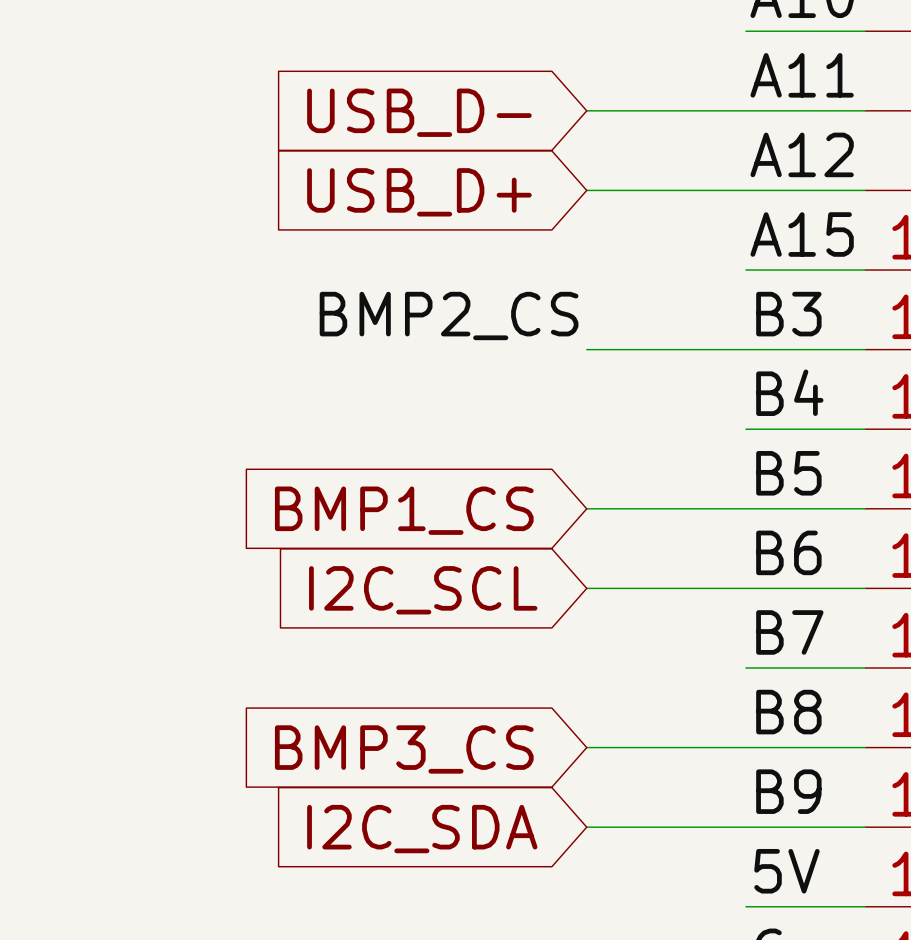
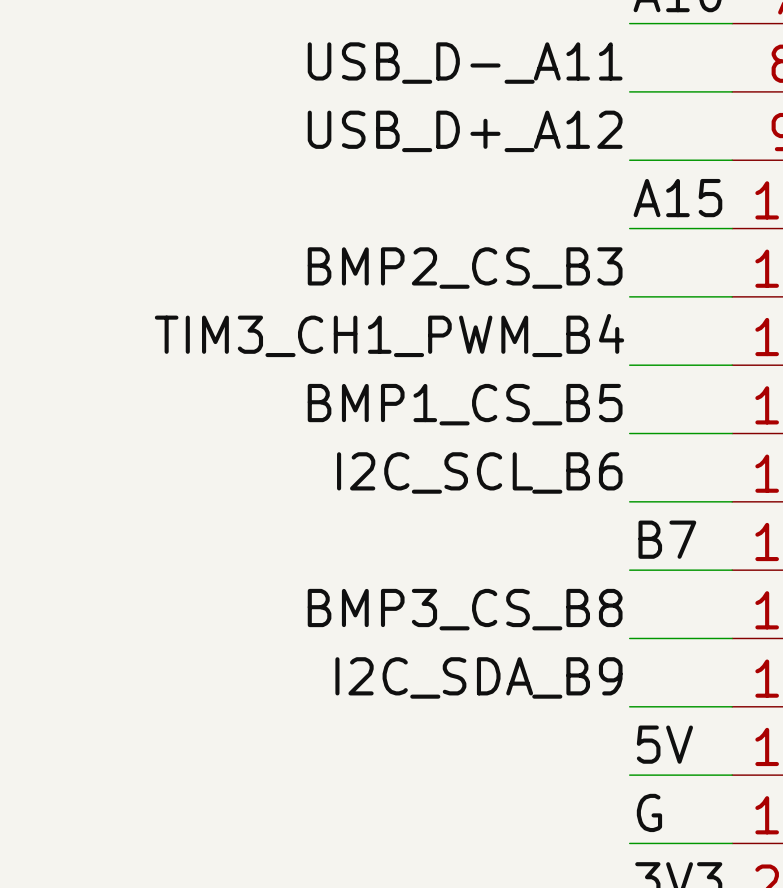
label: A11 (802, 75) -> USB_D-_A11 (465, 63)
wire: (586, 110) (745, 110) -> none
global label: USB_D- (419, 112) -> none
label: A12 (802, 154) -> USB_D+_A12 (465, 131)
wire: (586, 190) (745, 190) -> none
global label: USB_D+ (419, 192) -> none
label: B3 (788, 314) -> BMP2_CS_B3 (465, 268)
label: BMP2_CS (449, 316) -> none
wire: (586, 349) (745, 349) -> none
label: B4 (789, 392) -> TIM3_CH1_PWM_B4 (389, 335)
label: B5 (788, 473) -> BMP1_CS_B5 (465, 404)
wire: (586, 508) (745, 508) -> none
global label: BMP1_CS (404, 510) -> none
label: B6 (788, 552) -> I2C_SCL_B6 (479, 472)
wire: (586, 588) (745, 588) -> none
global label: I2C_SCL (423, 590) -> none
label: B8 (788, 712) -> BMP3_CS_B8 (465, 609)
wire: (586, 747) (745, 747) -> none
global label: BMP3_CS (404, 749) -> none
label: B9 (788, 791) -> I2C_SDA_B9 (478, 677)
wire: (586, 827) (745, 827) -> none
global label: I2C_SDA (422, 829) -> none

